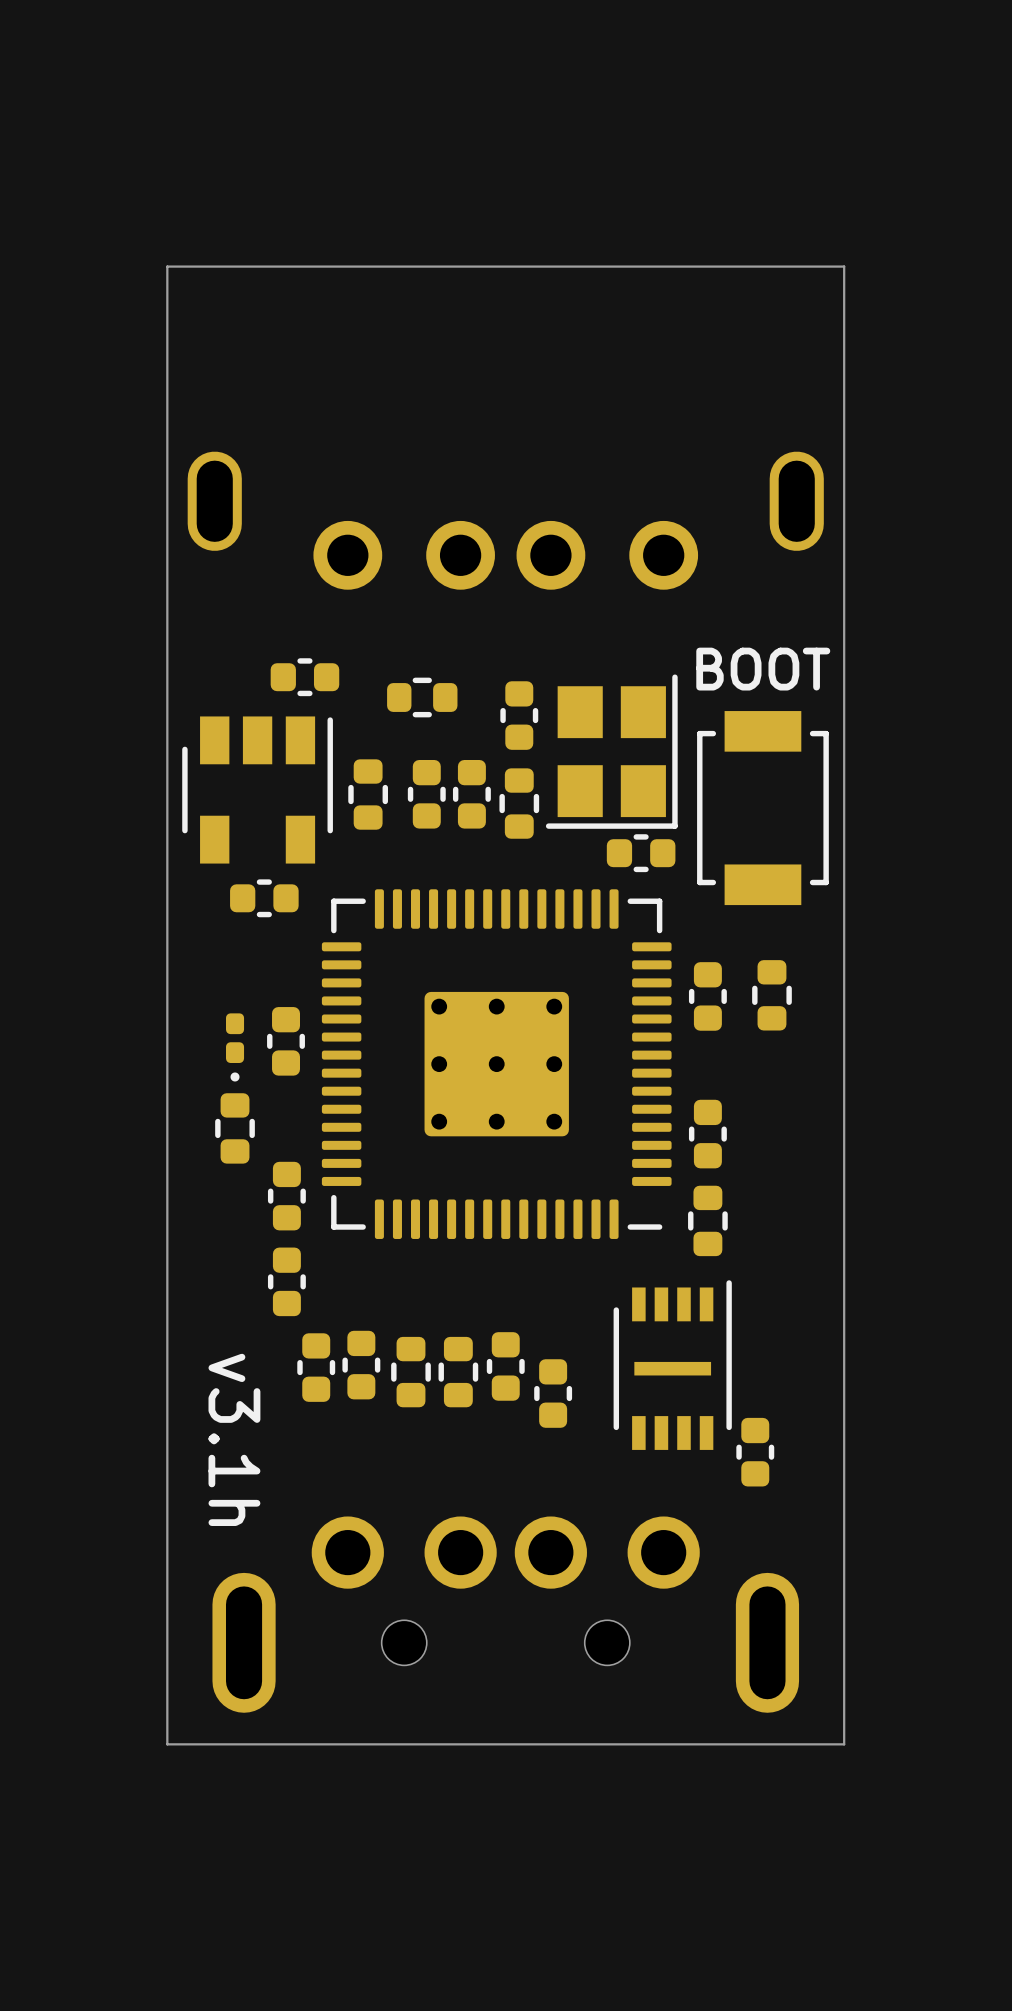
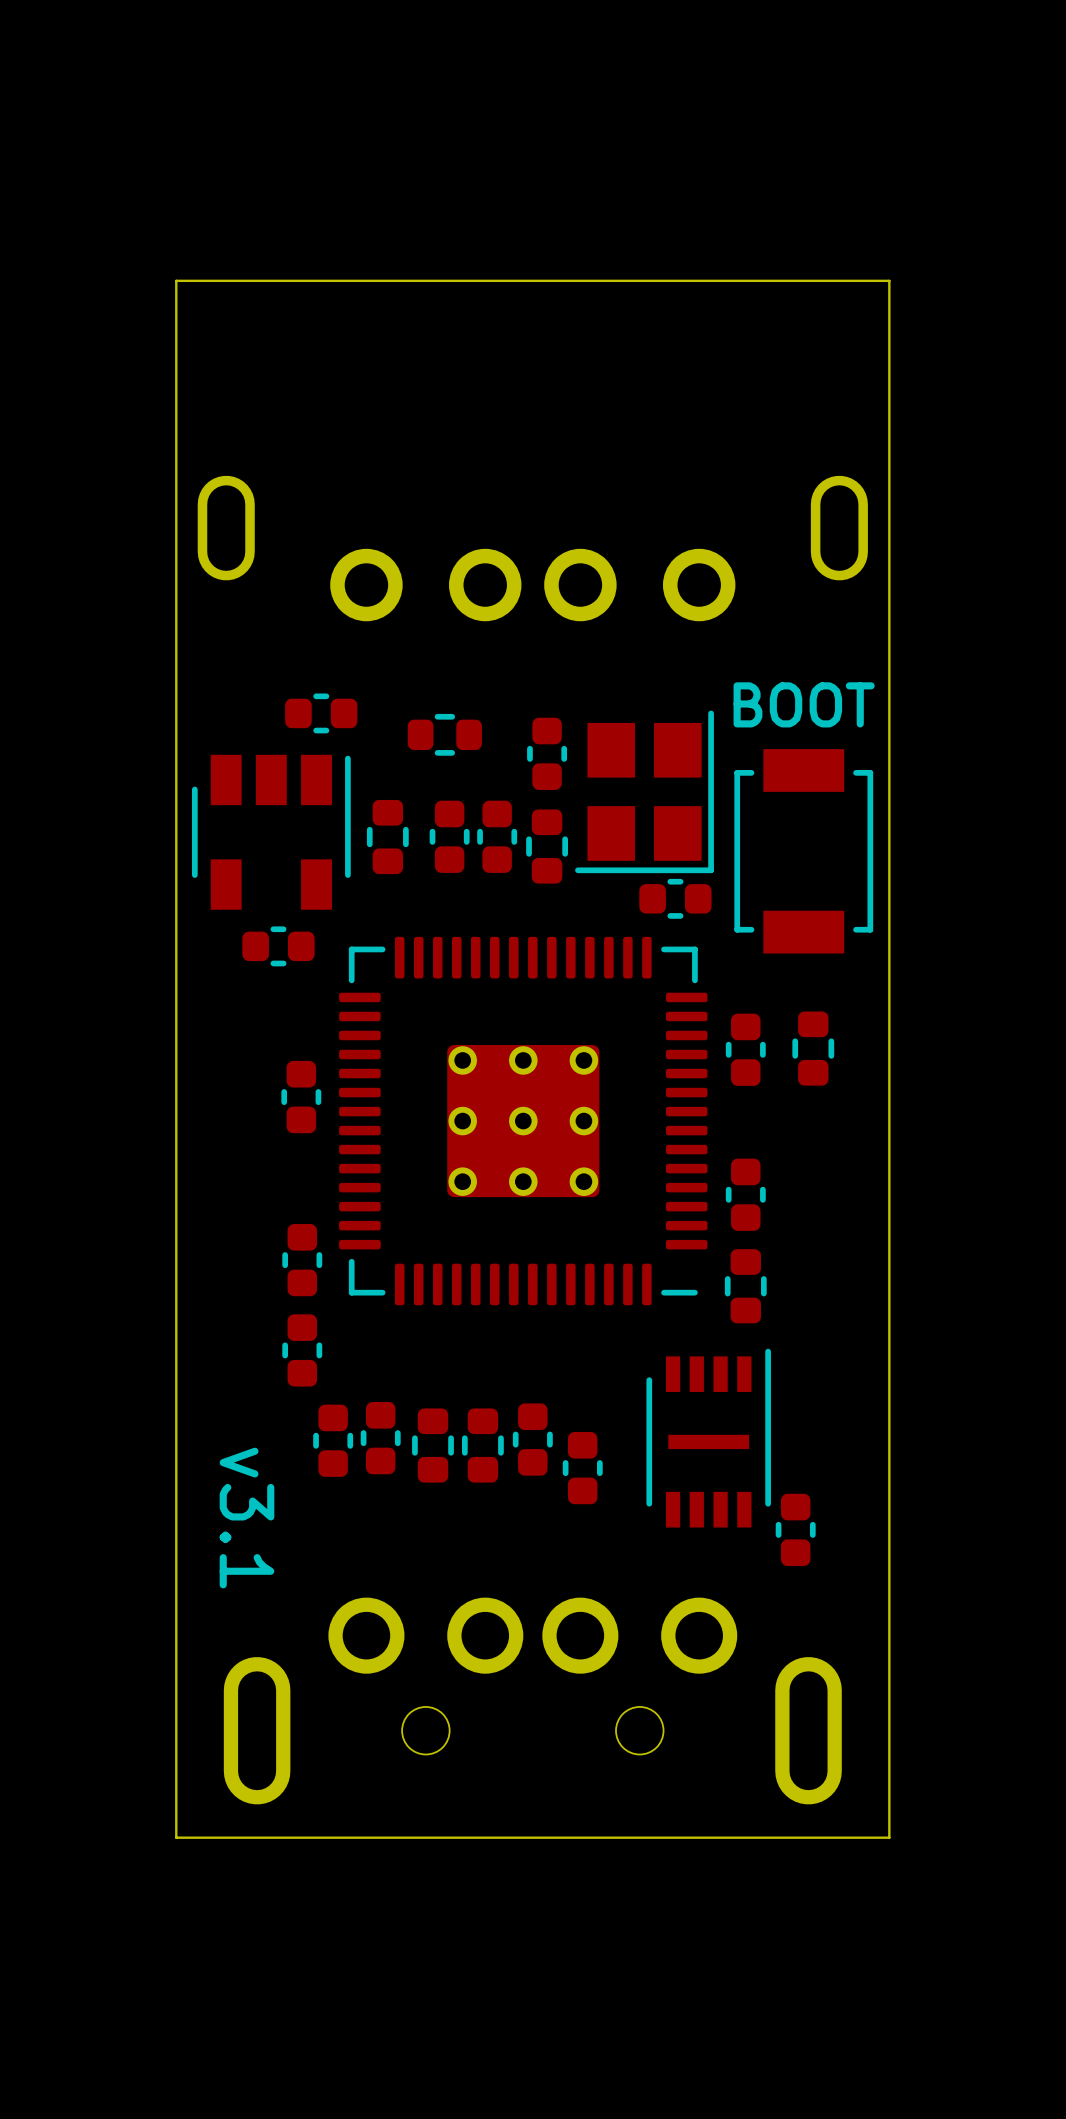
part: (235, 1047) -> none
part: (235, 1128) -> none
text: v3.1h (234, 1439) -> v3.1 (246, 1518)

